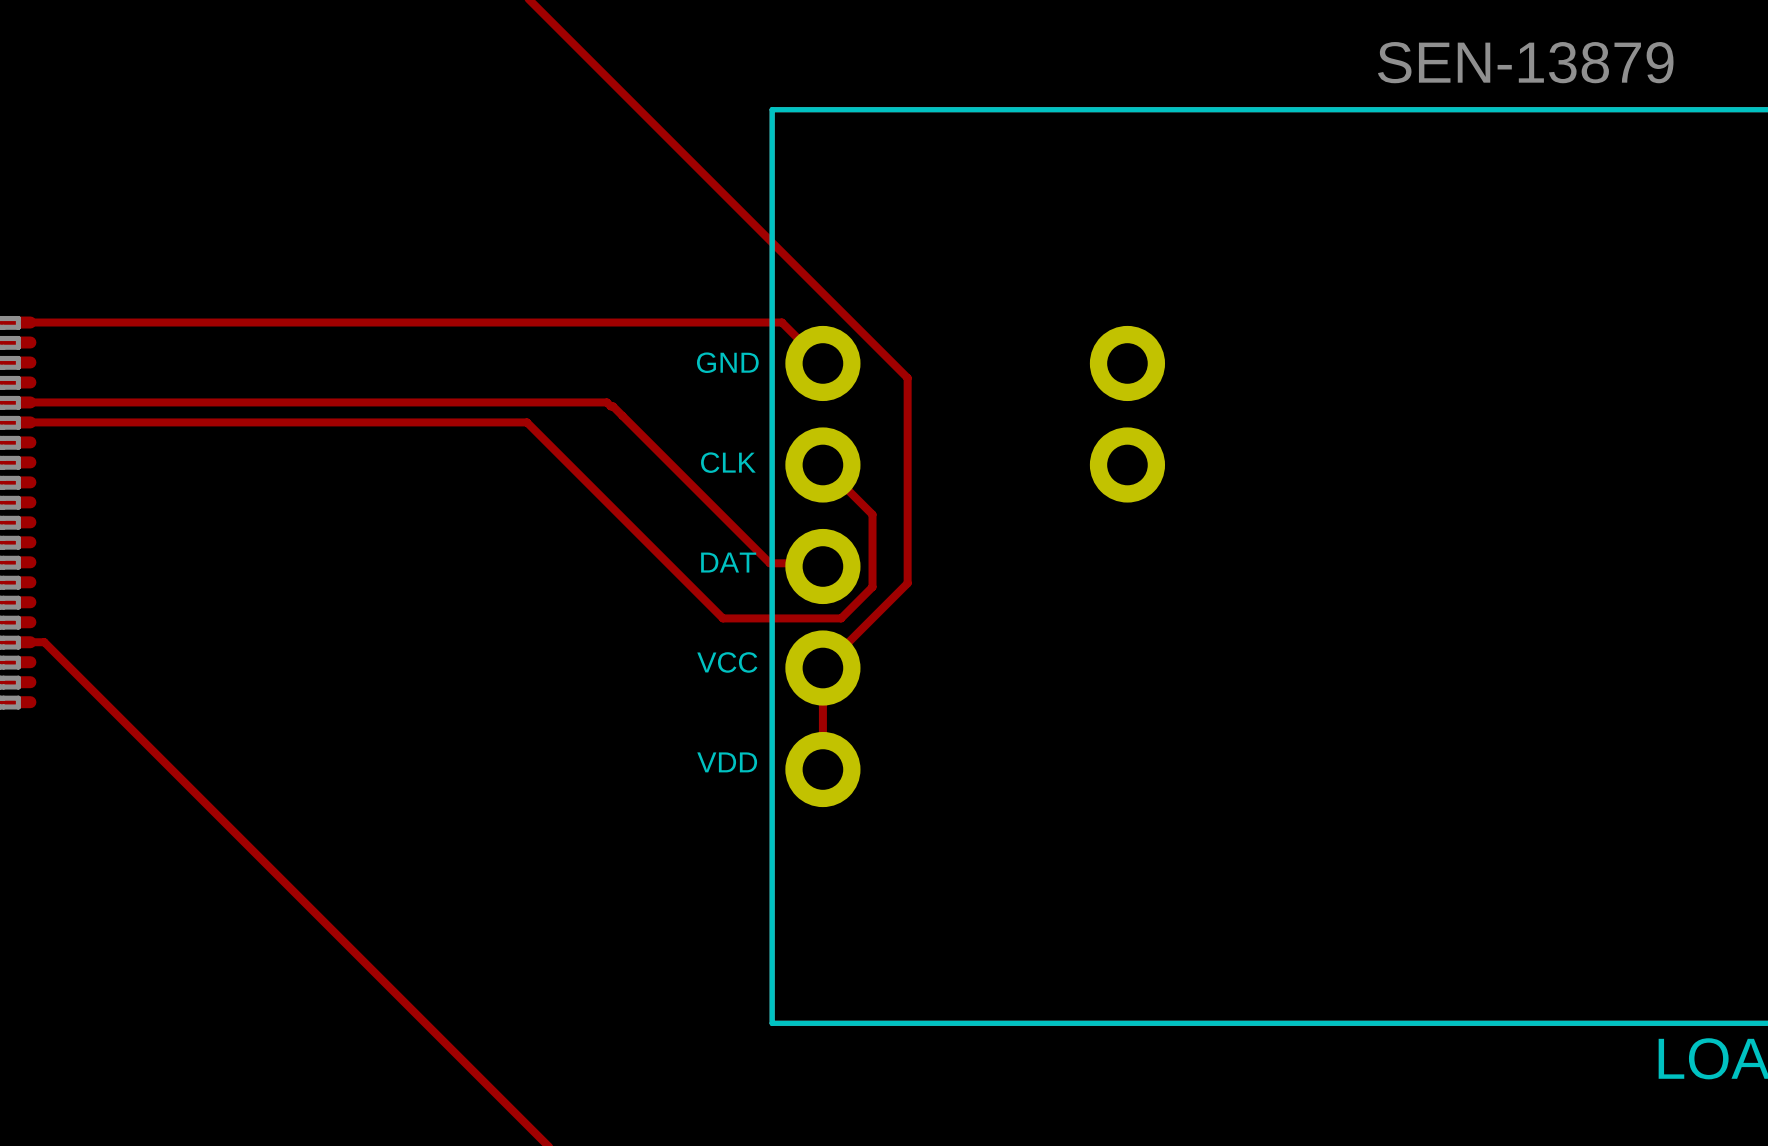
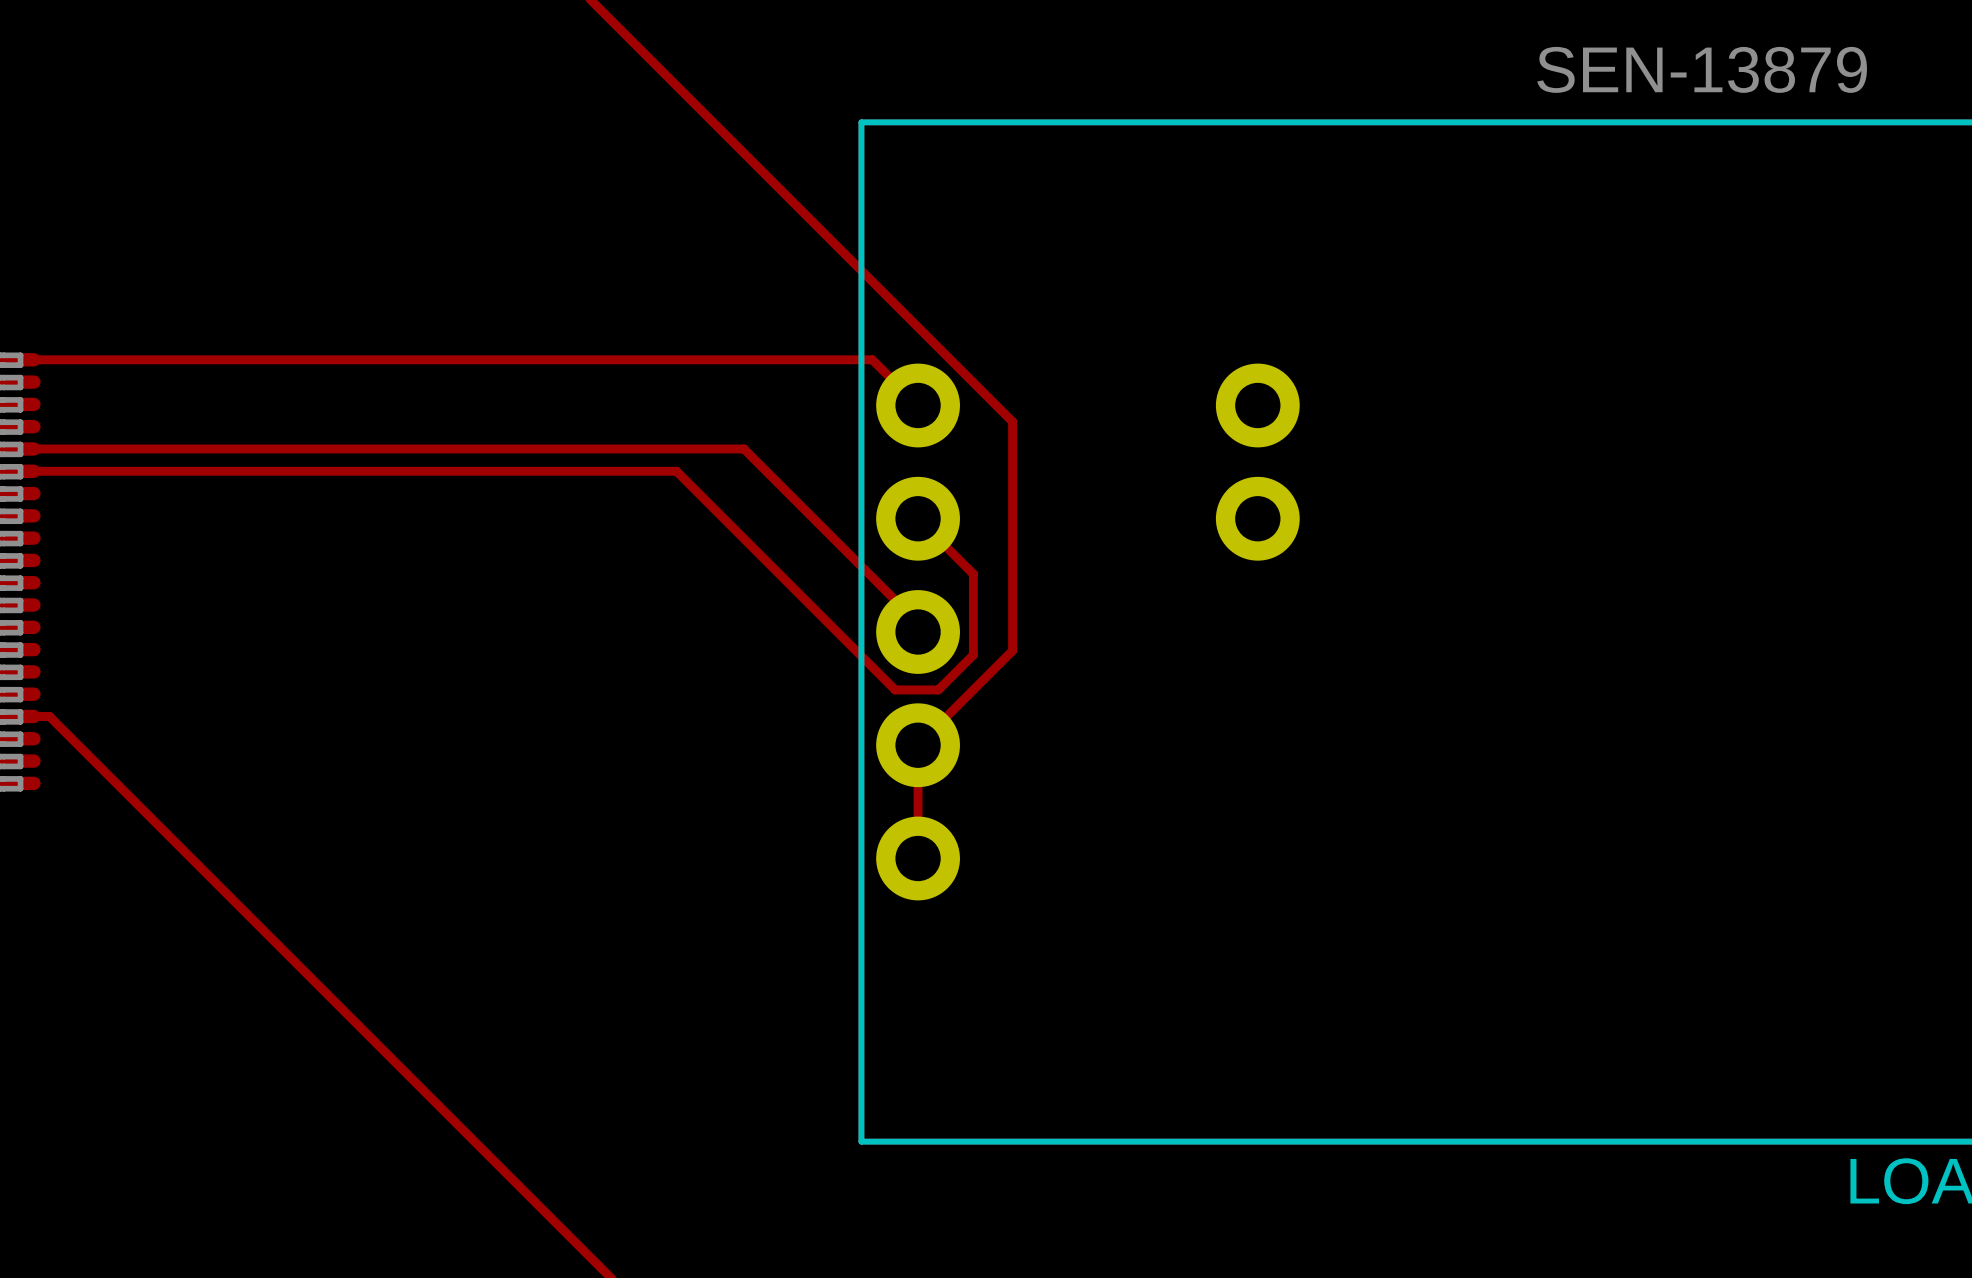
text: GND (727, 362) -> none
track: (606, 402) (769, 563) (827, 563) -> (677, 448) (743, 448) (923, 628)
track: (526, 422) (722, 618) (802, 618) -> (587, 471) (676, 471) (895, 689)
text: CLK (728, 462) -> none
text: DAT (728, 562) -> none
text: VCC (727, 662) -> none
text: VDD (727, 762) -> none

